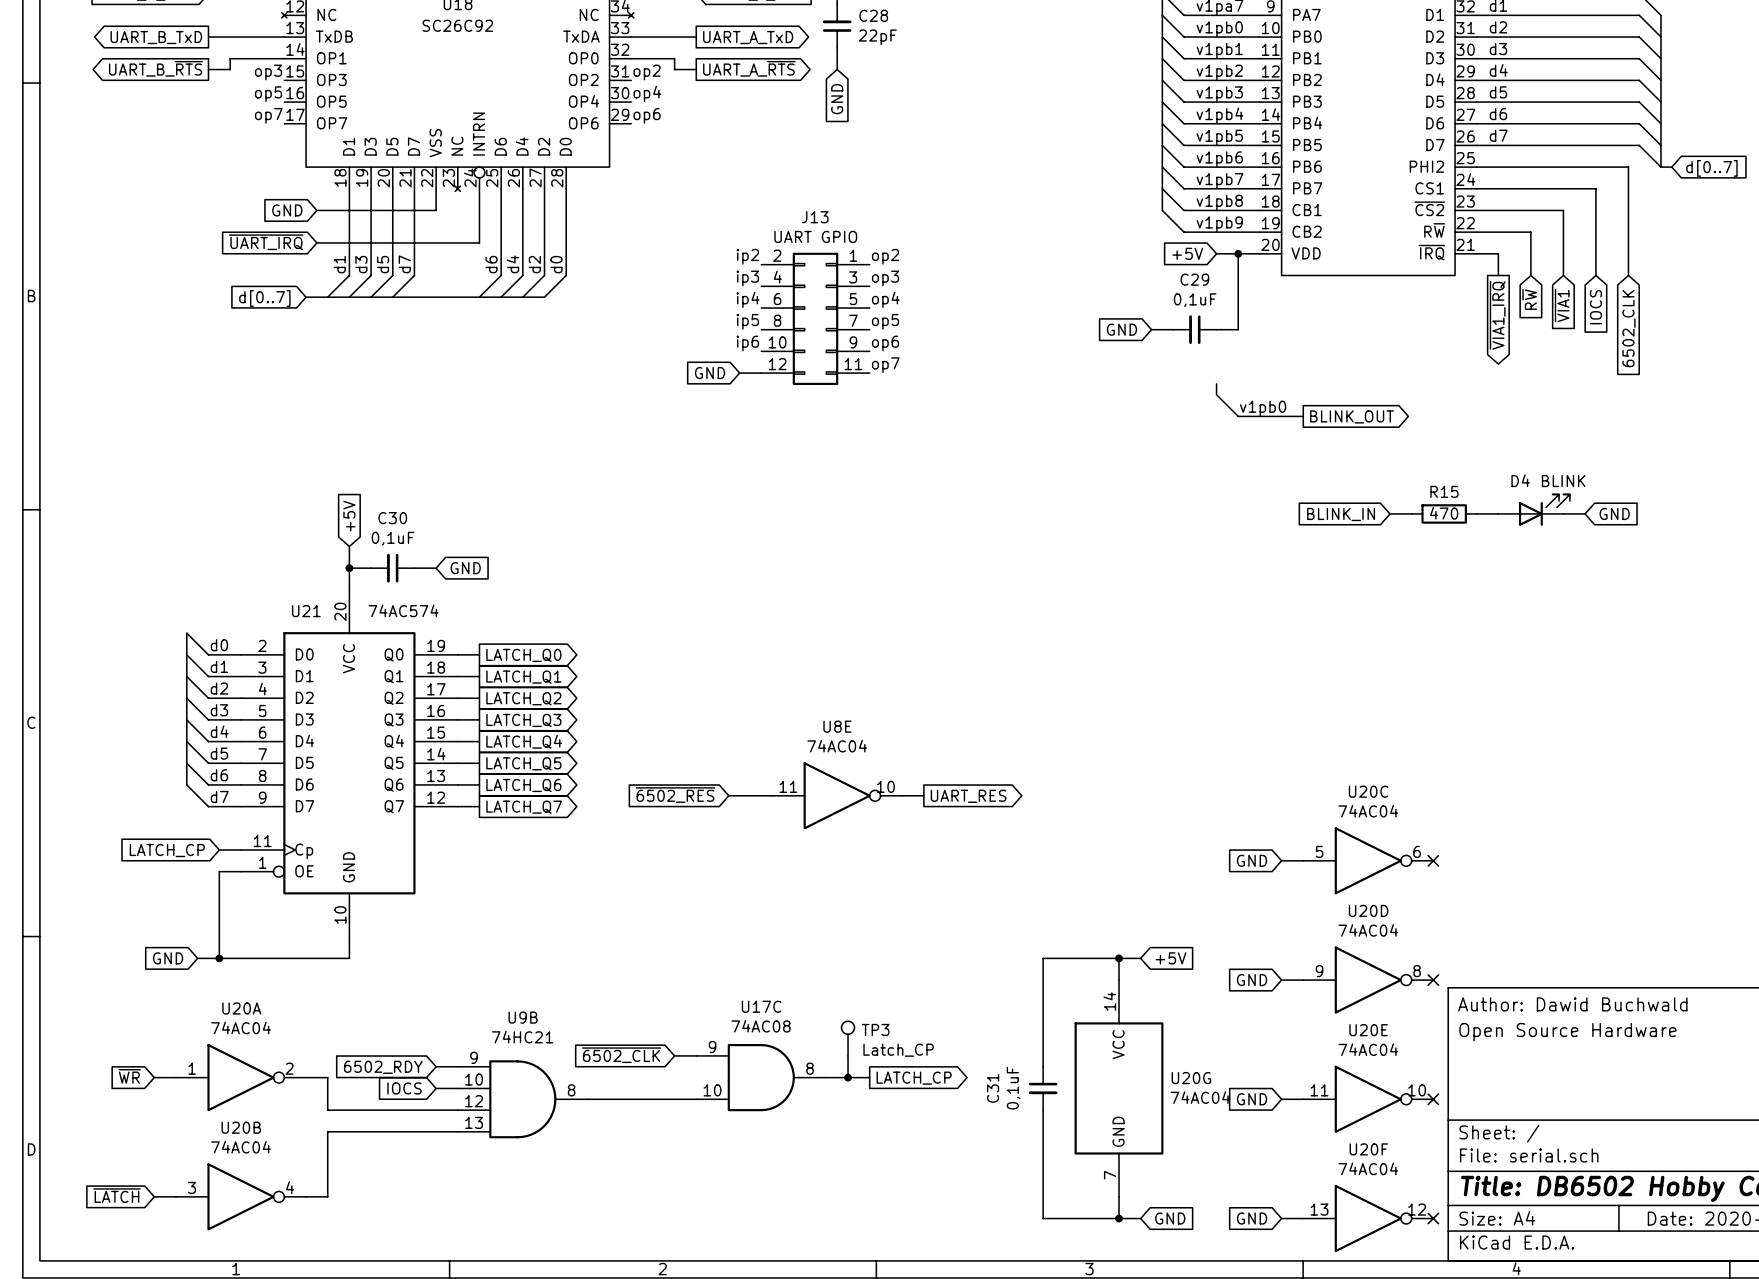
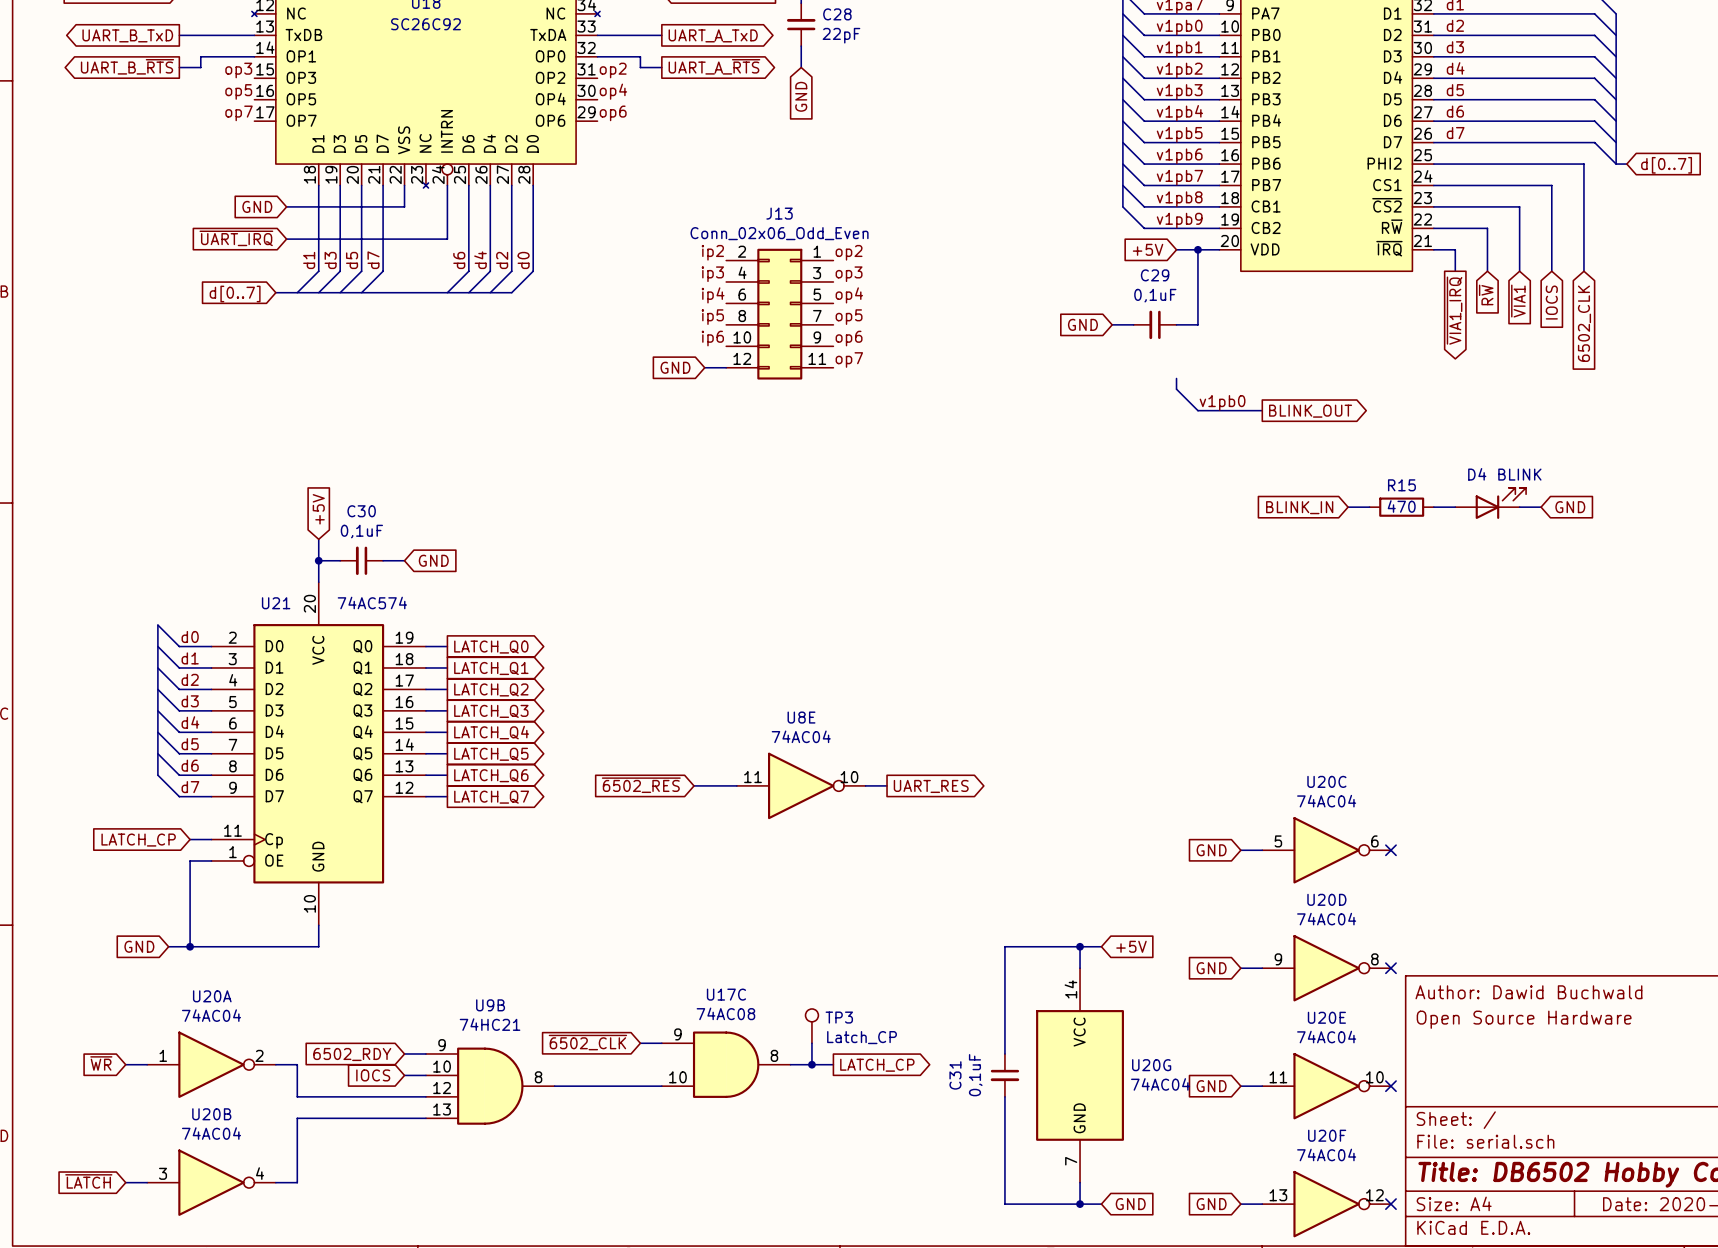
J13 value: UART GPIO (815, 236) -> Conn_02x06_Odd_Even (779, 233)

